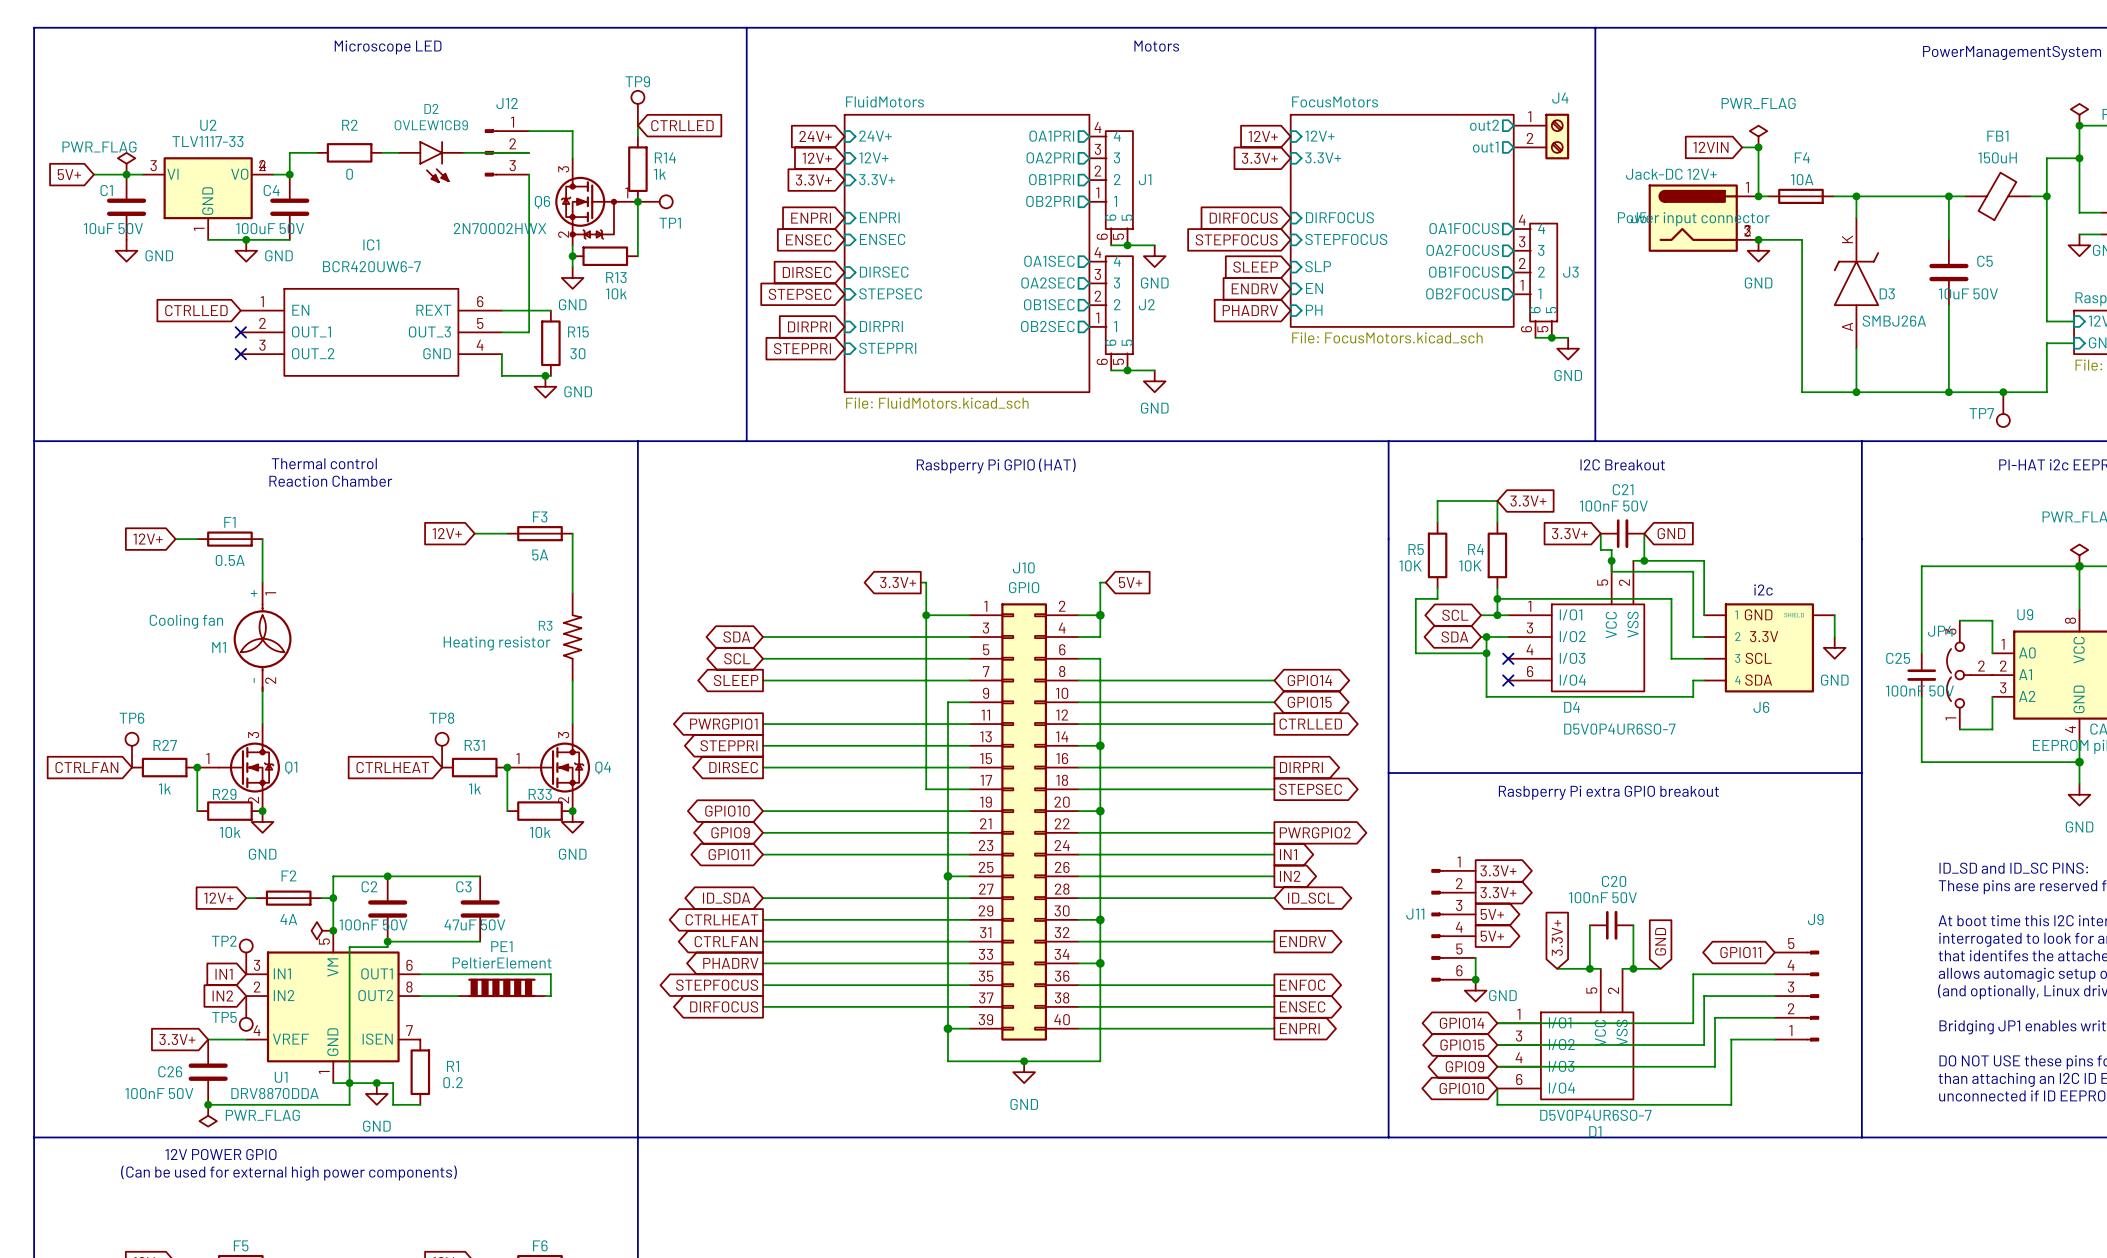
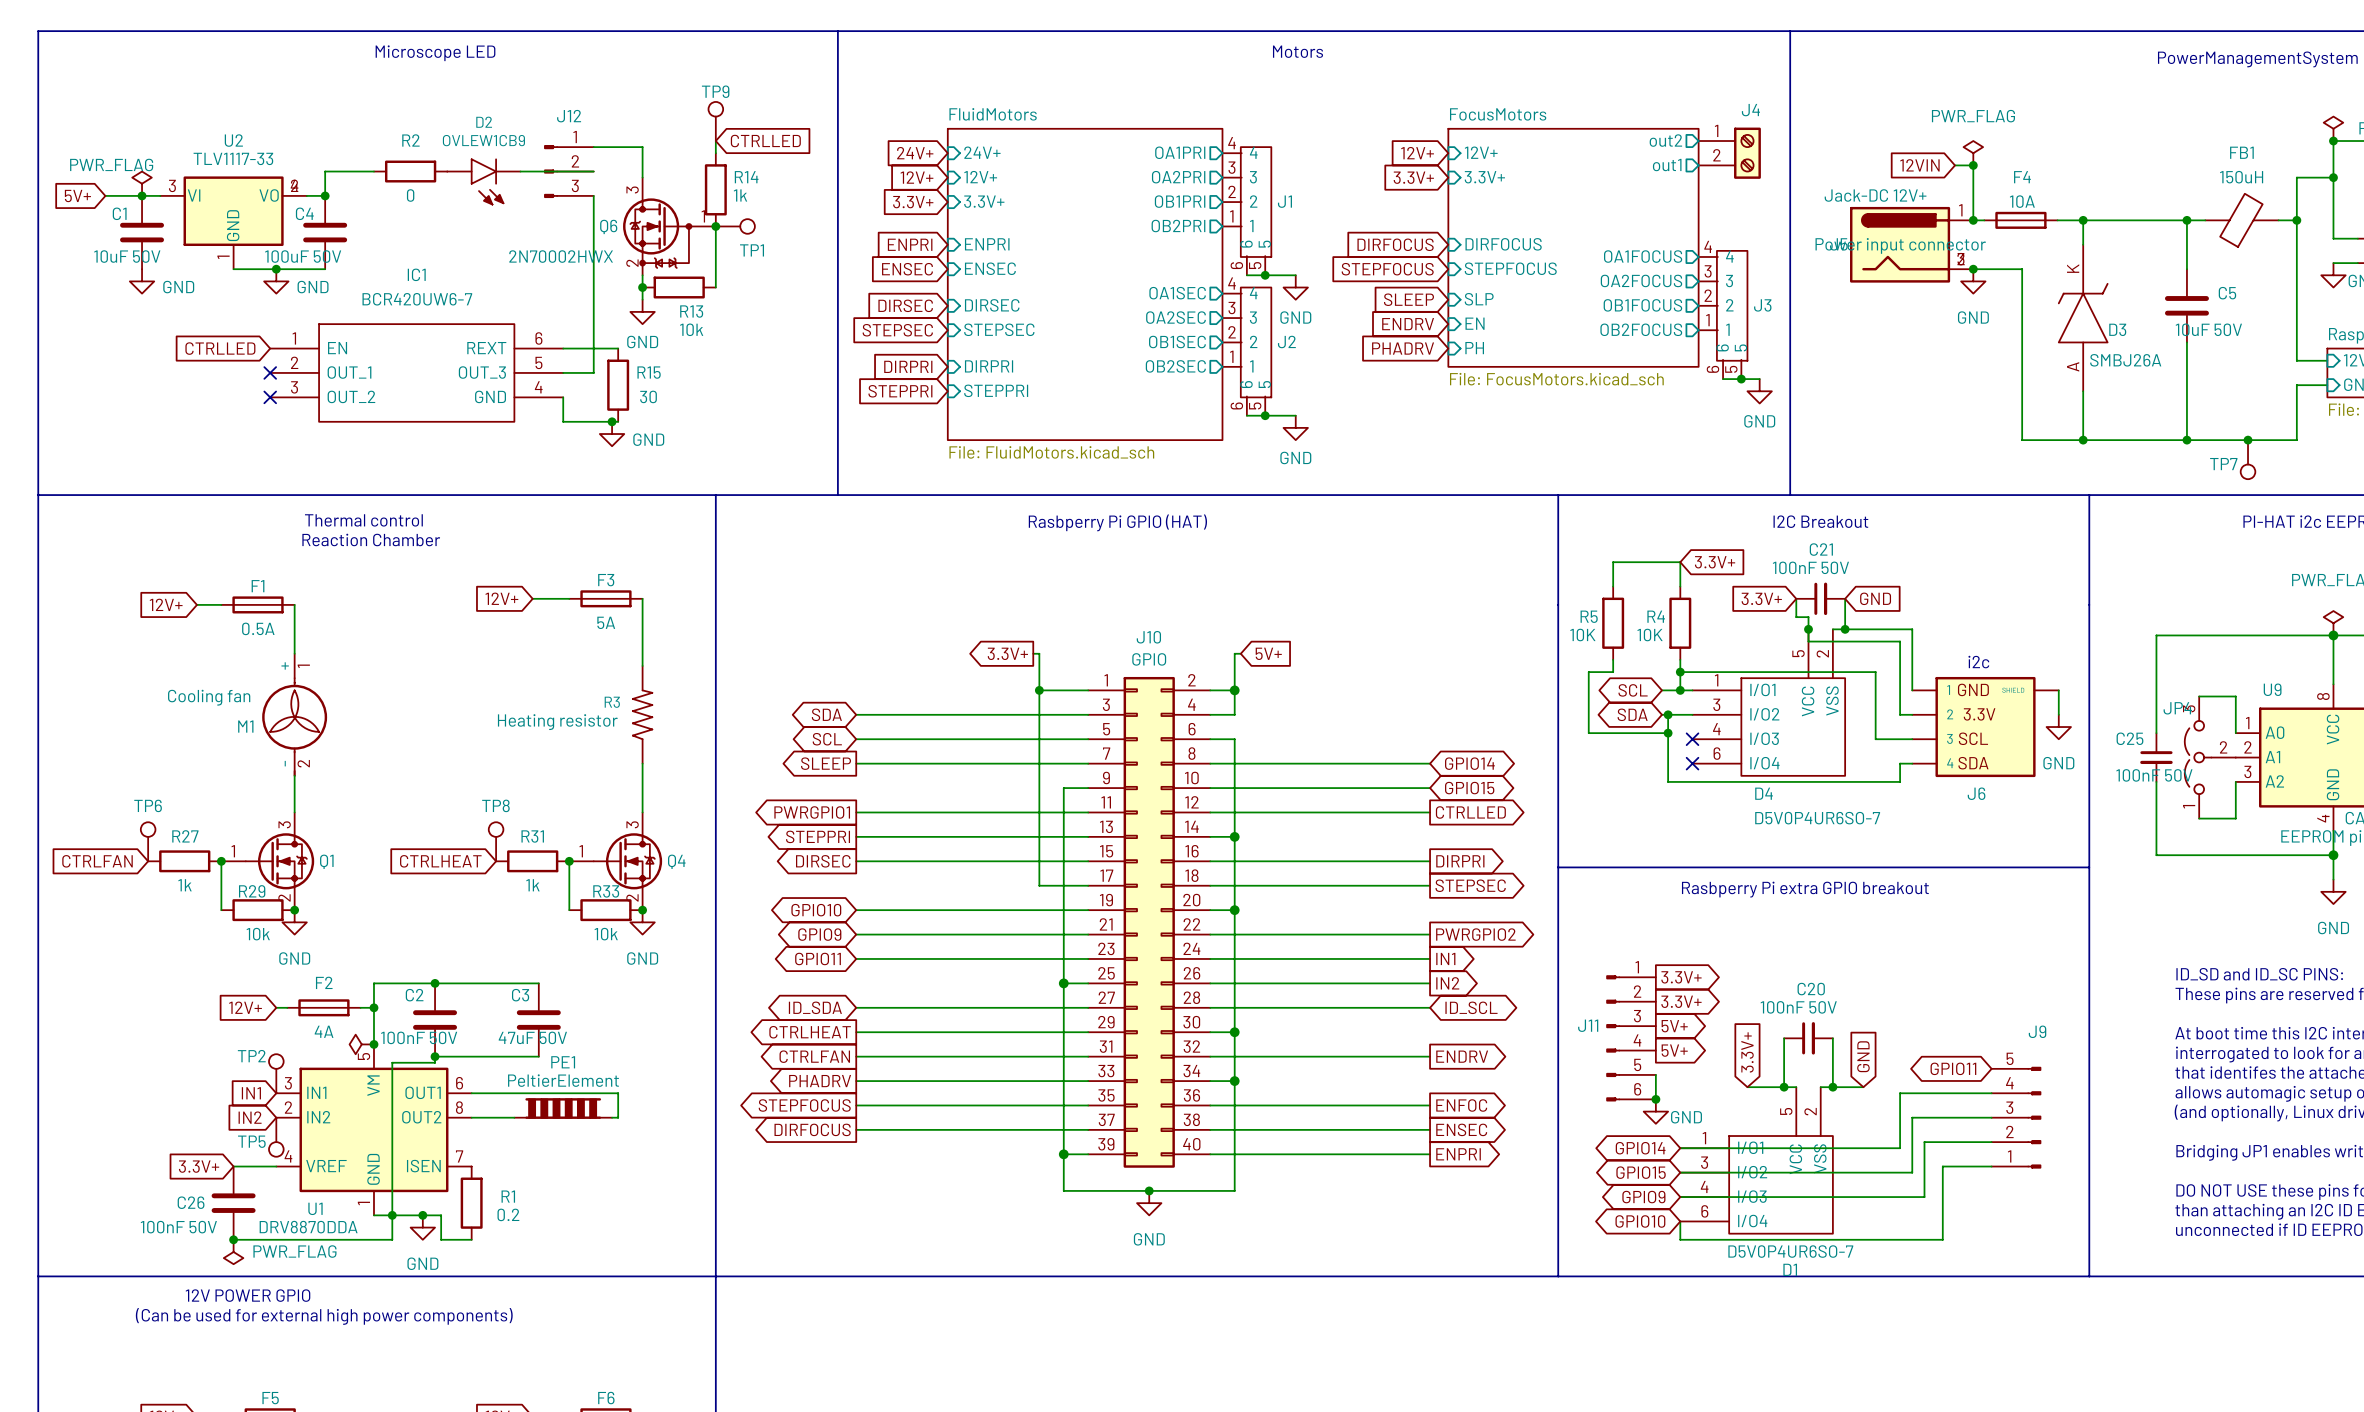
R2 position: (349, 152) -> (410, 171)

